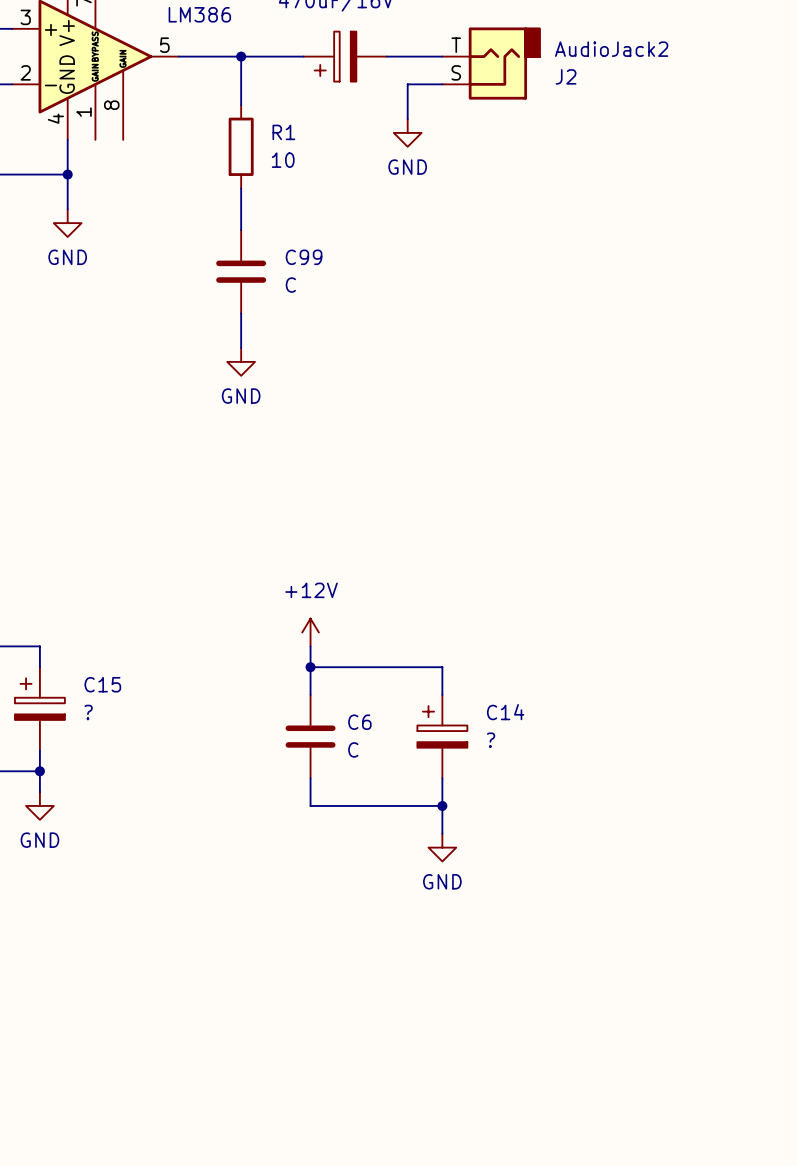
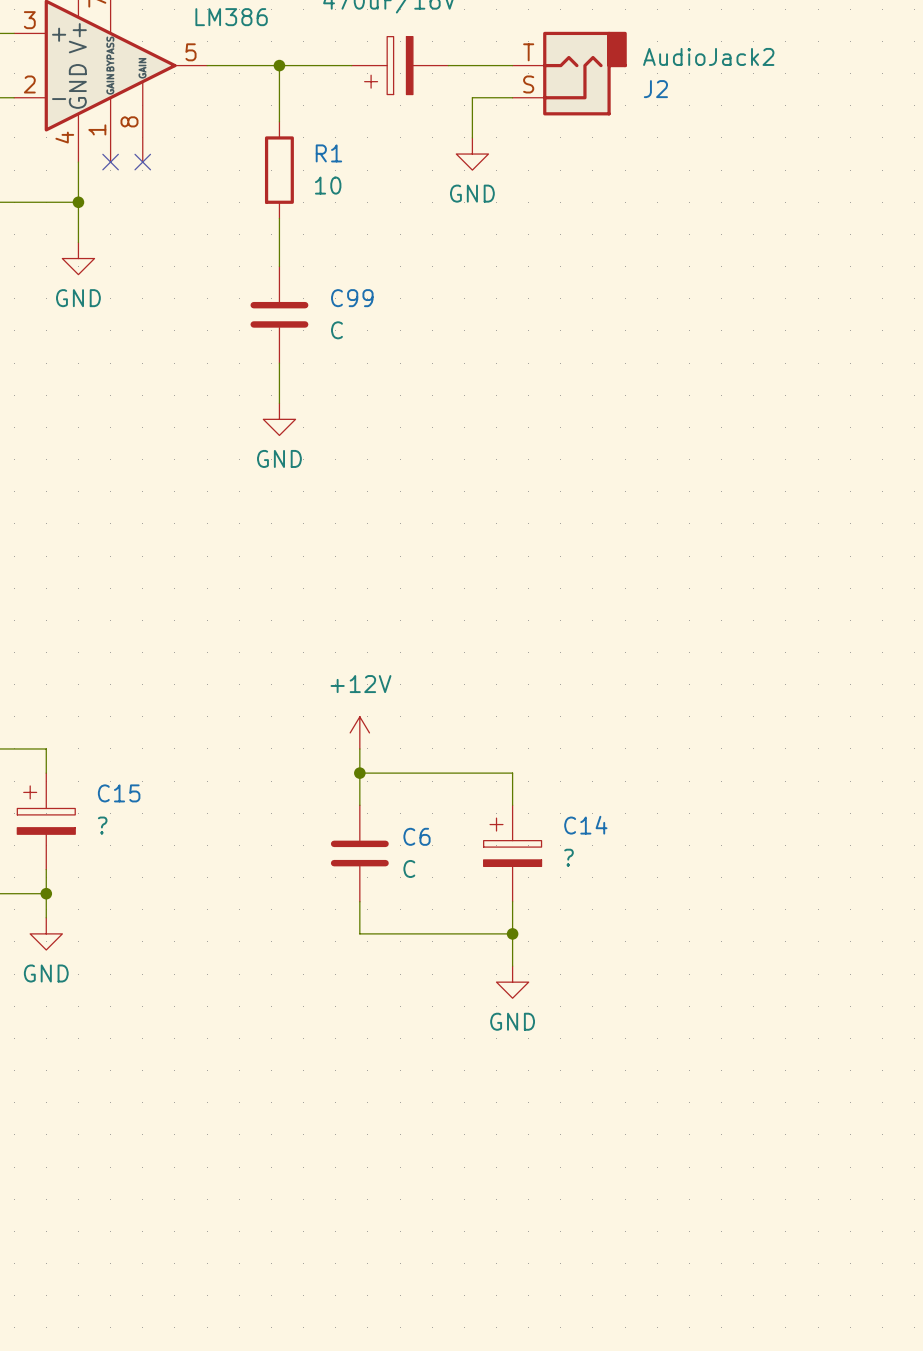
no-connect mark: none -> (110, 162)
no-connect mark: none -> (142, 162)

